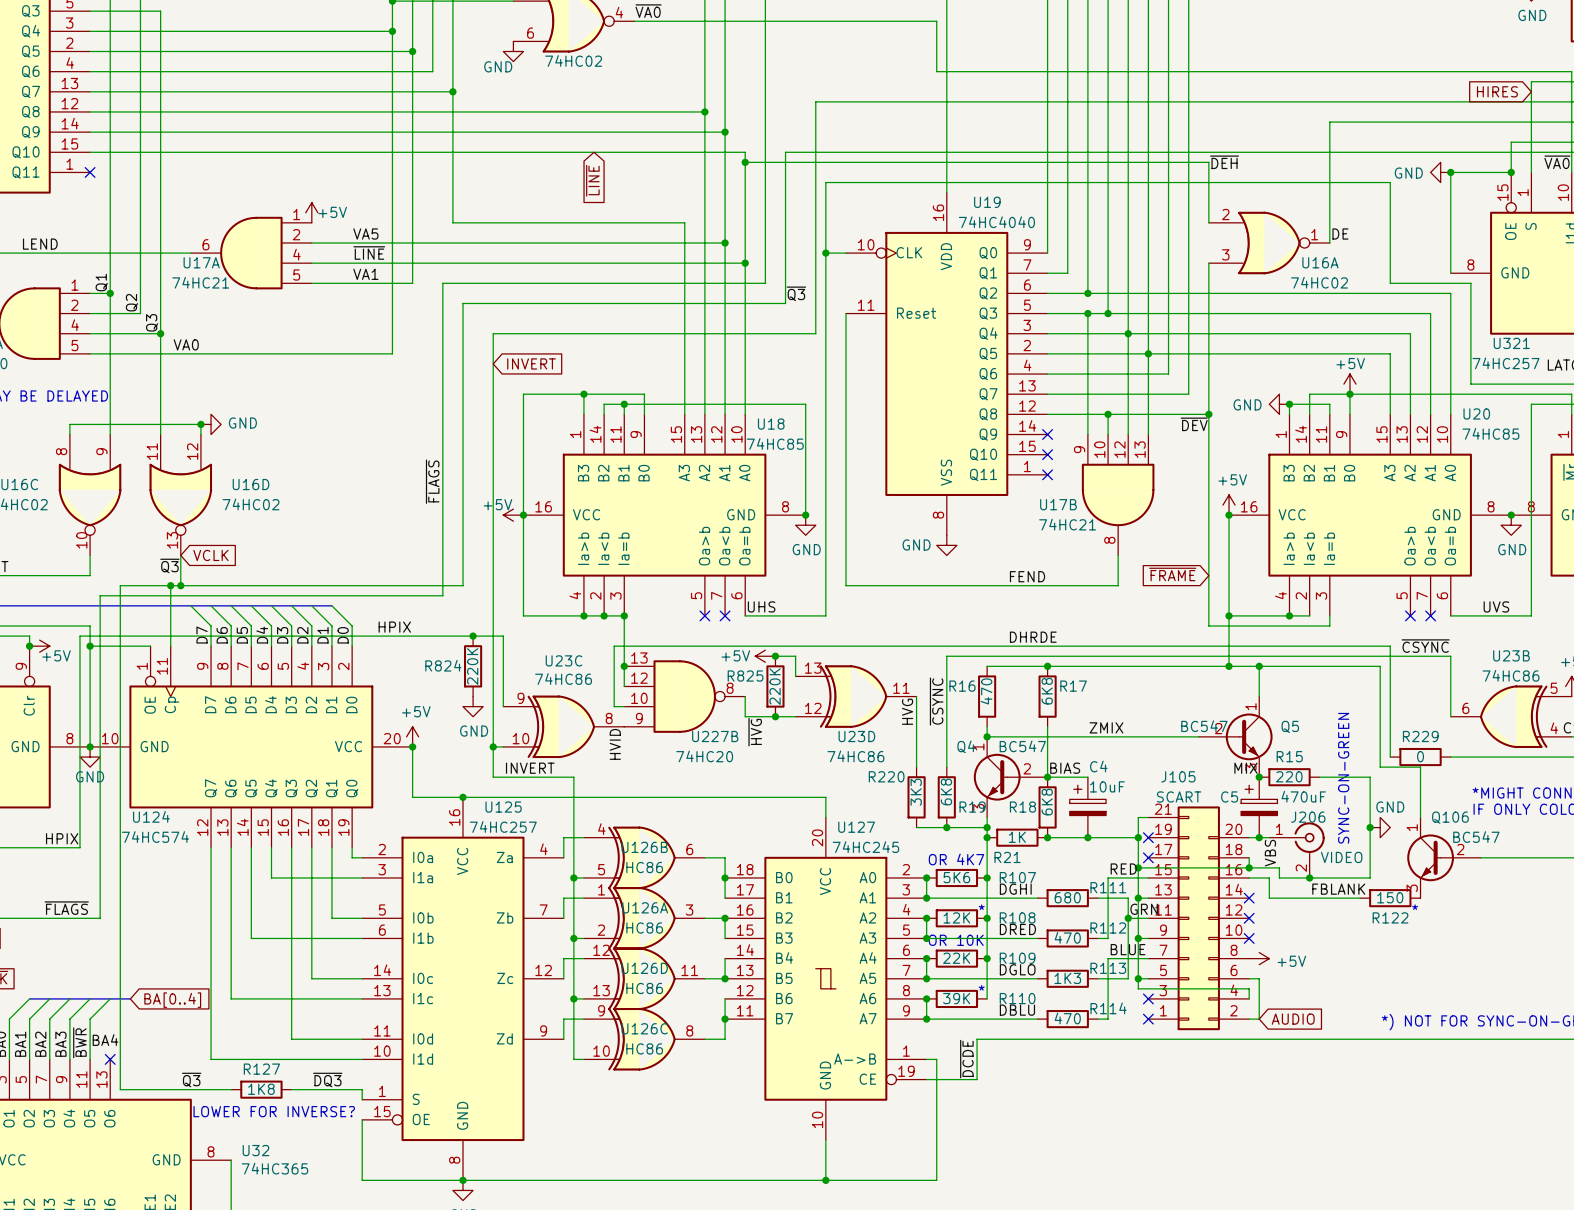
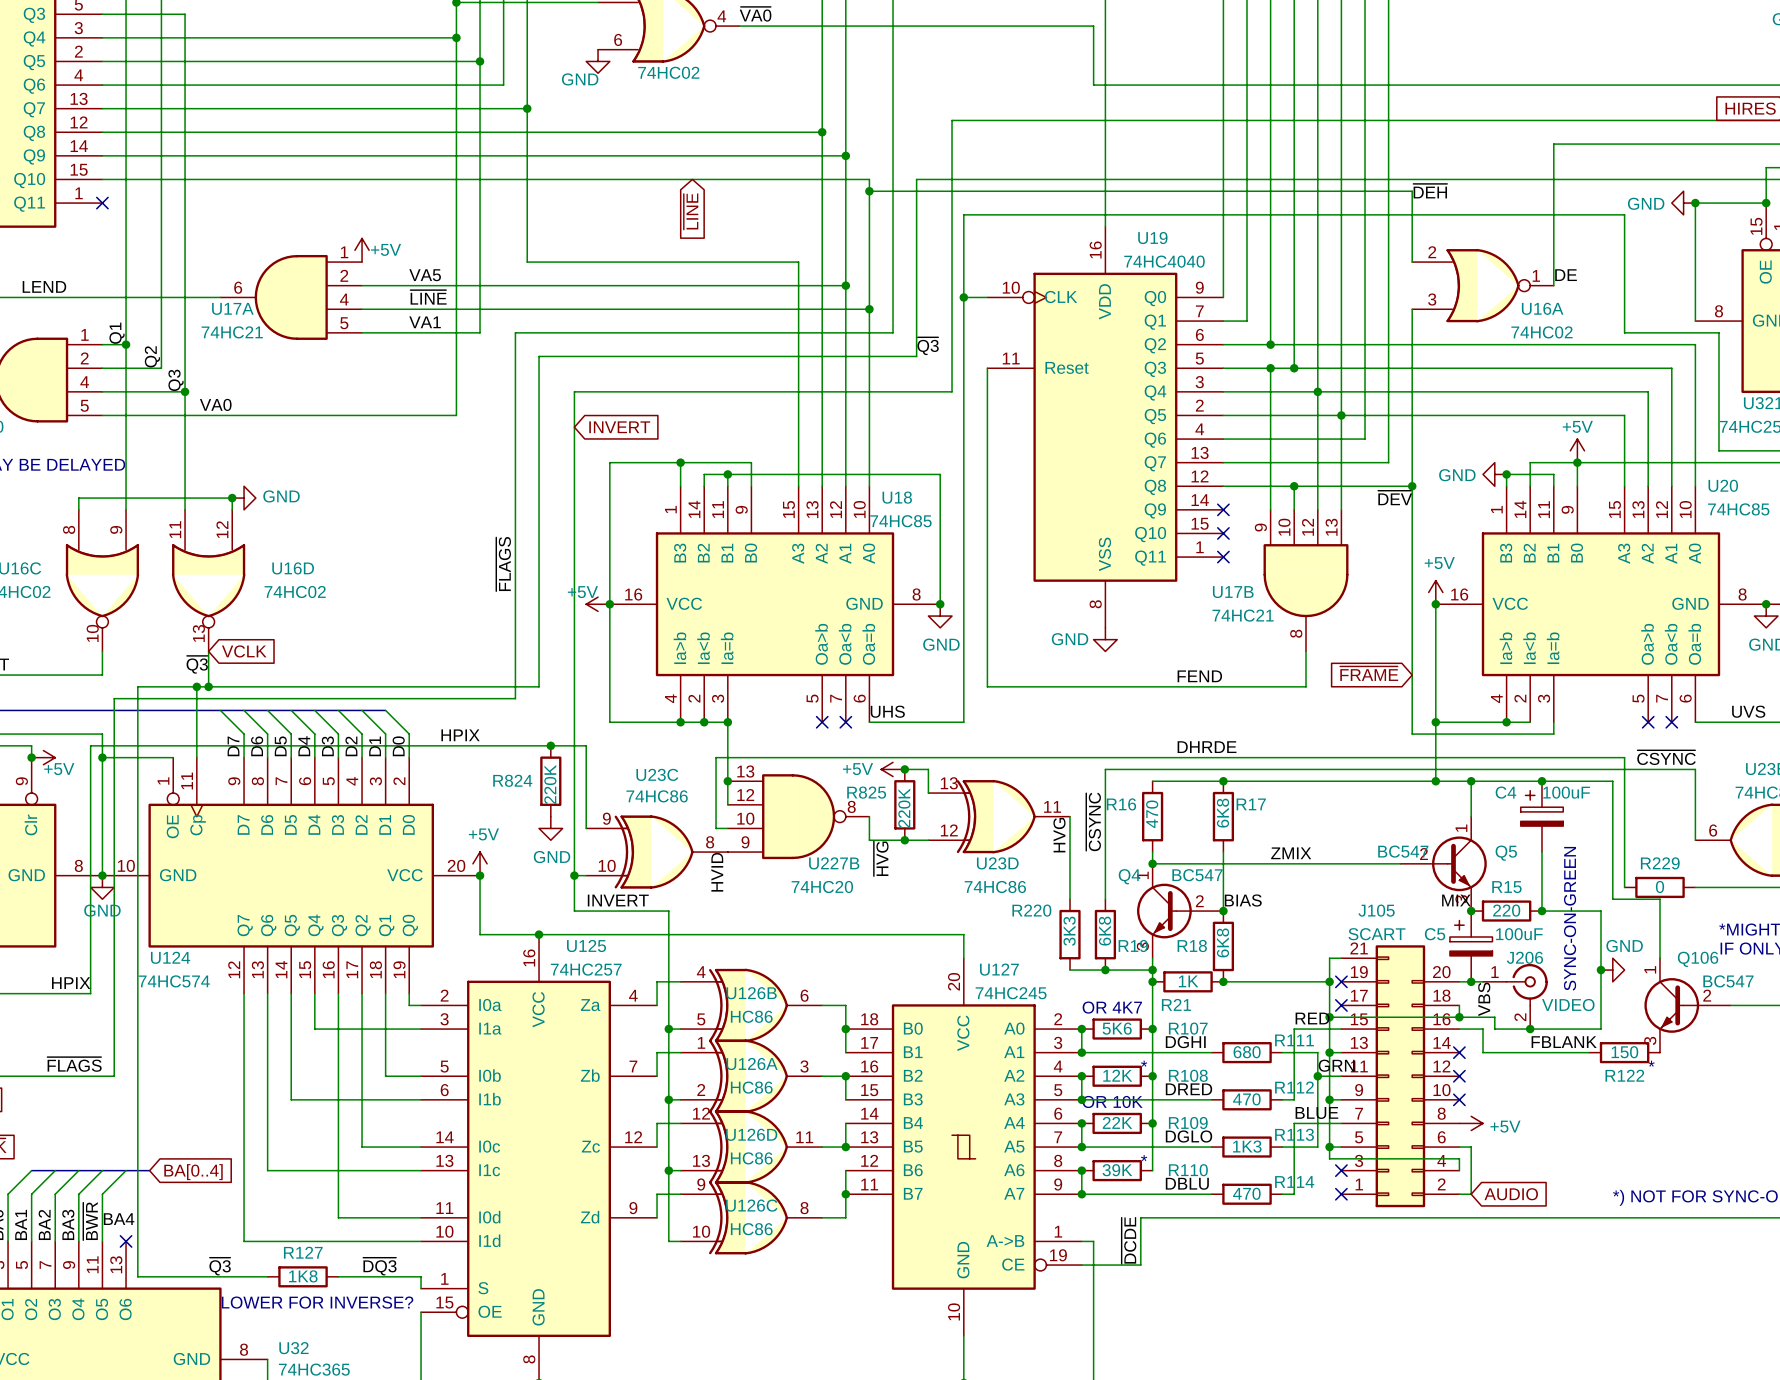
junction: none -> (1542, 781)
wire: none -> (1542, 852) (1542, 911)
C4 name position: C4 (1098, 766) -> C4 (1505, 792)
wire: (1047, 777) (1087, 777) -> none
junction: none -> (1542, 911)
C4 value: 10uF (1107, 786) -> 100uF (1566, 792)
C5 value: 470uF (1303, 796) -> 100uF (1519, 934)
C4 position: (1087, 807) -> (1542, 816)
junction: (1087, 837) -> none

